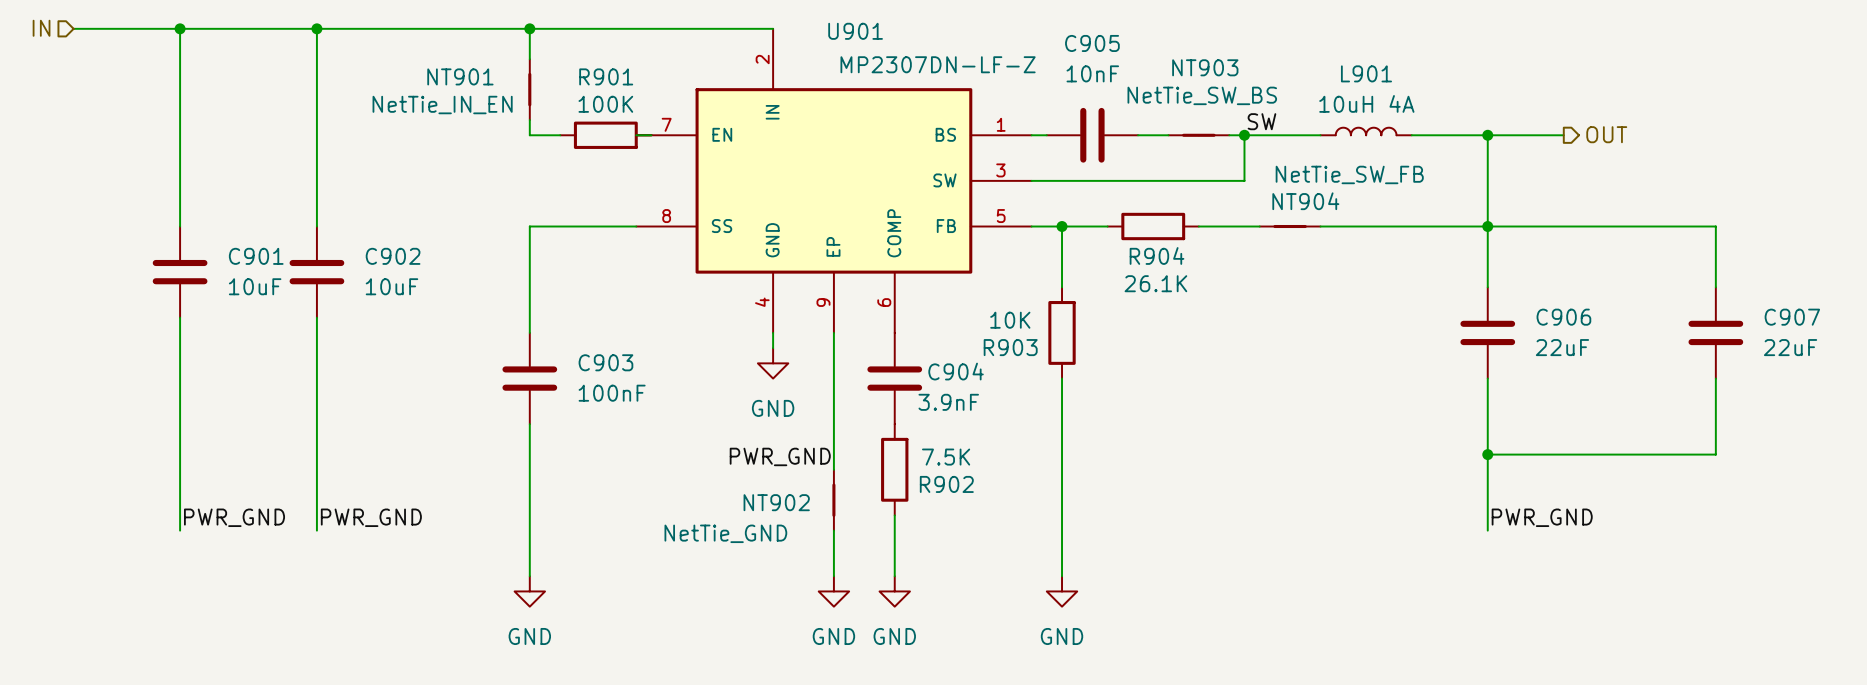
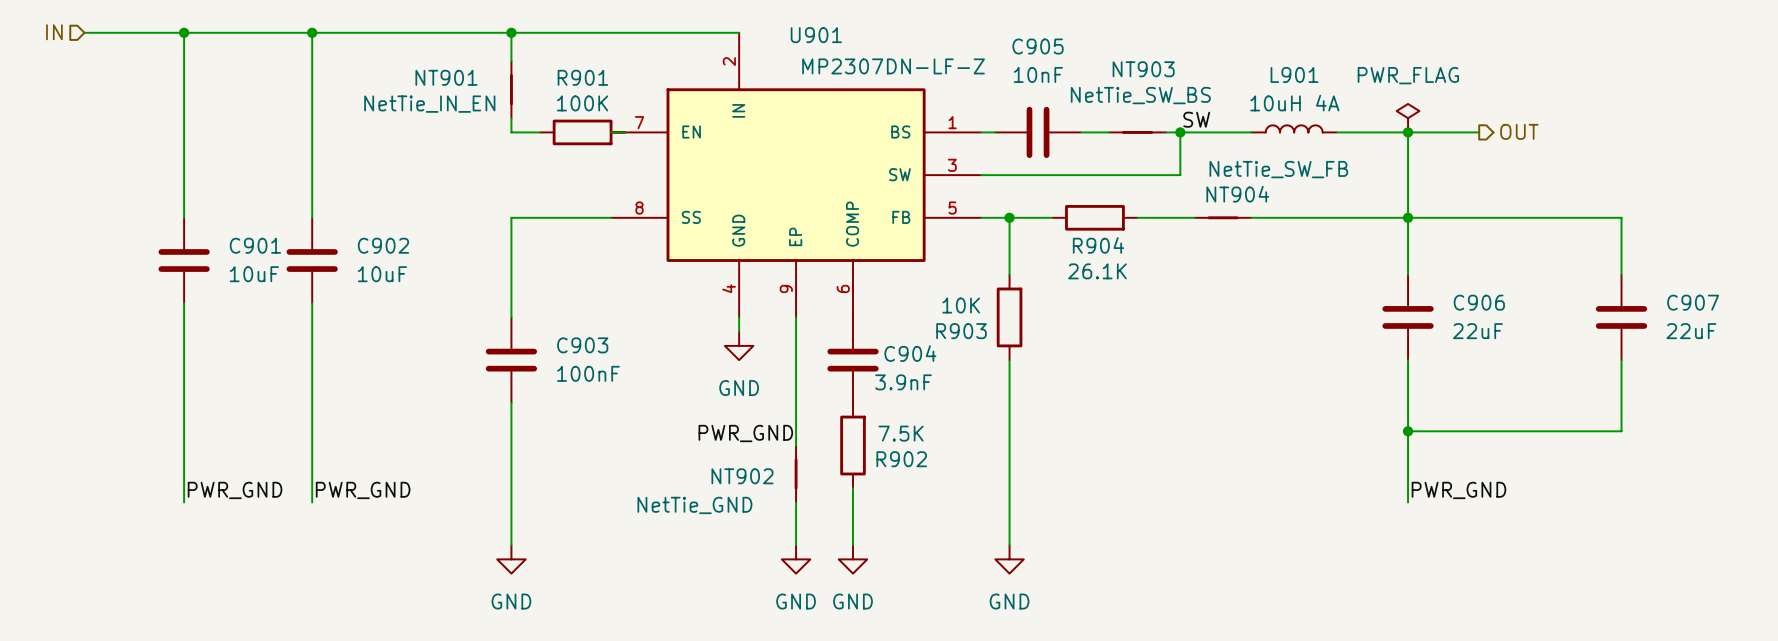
power symbol: none -> PWR_FLAG (1408, 118)

